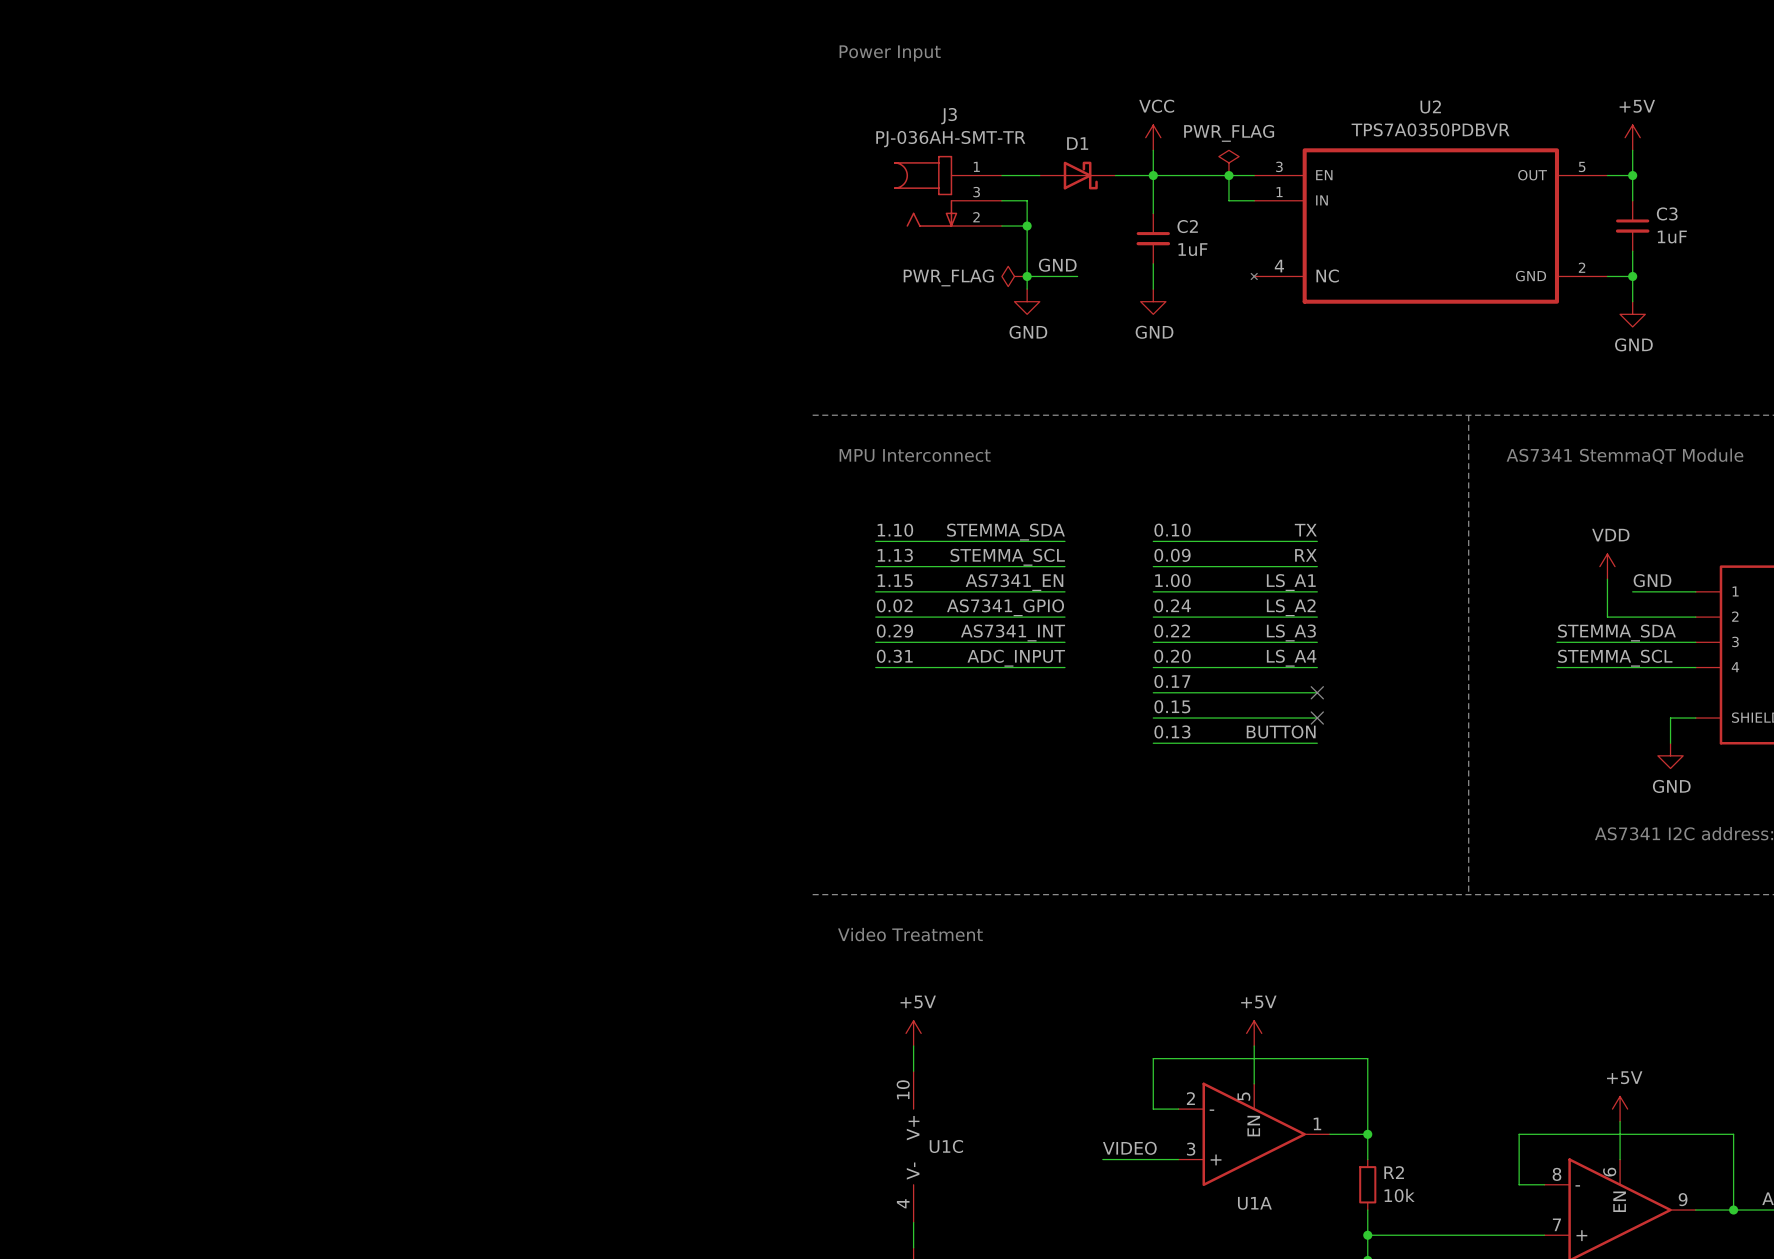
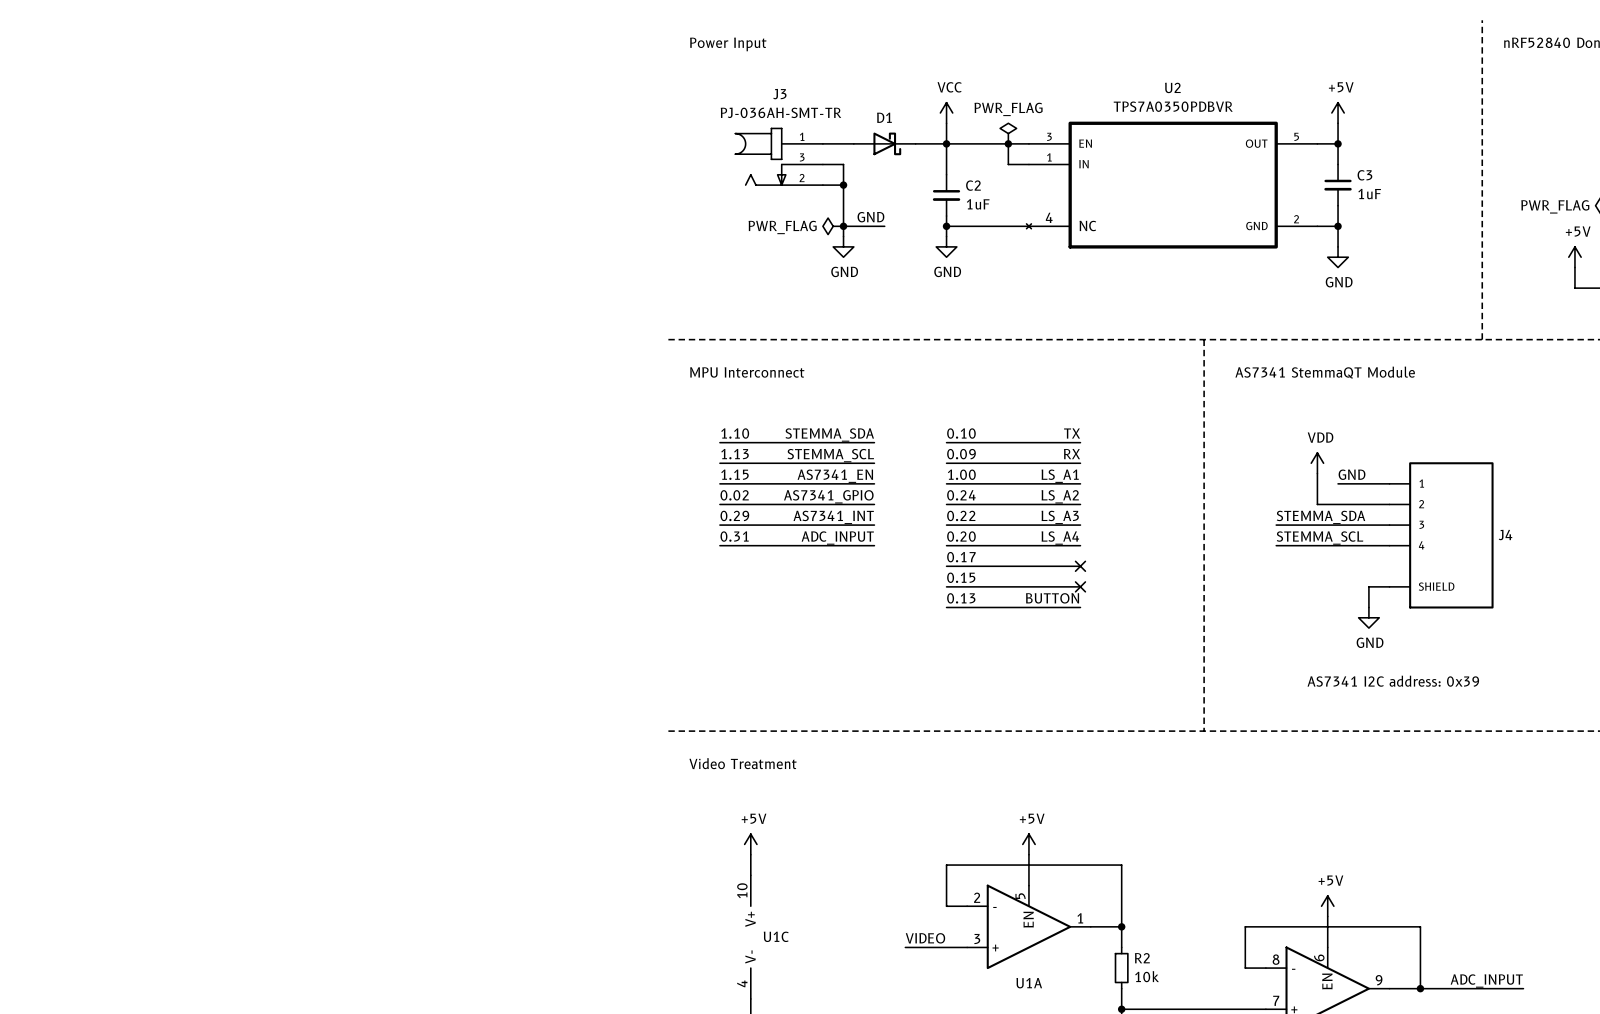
wire: none -> (946, 226) (1028, 226)
junction: none -> (946, 226)

